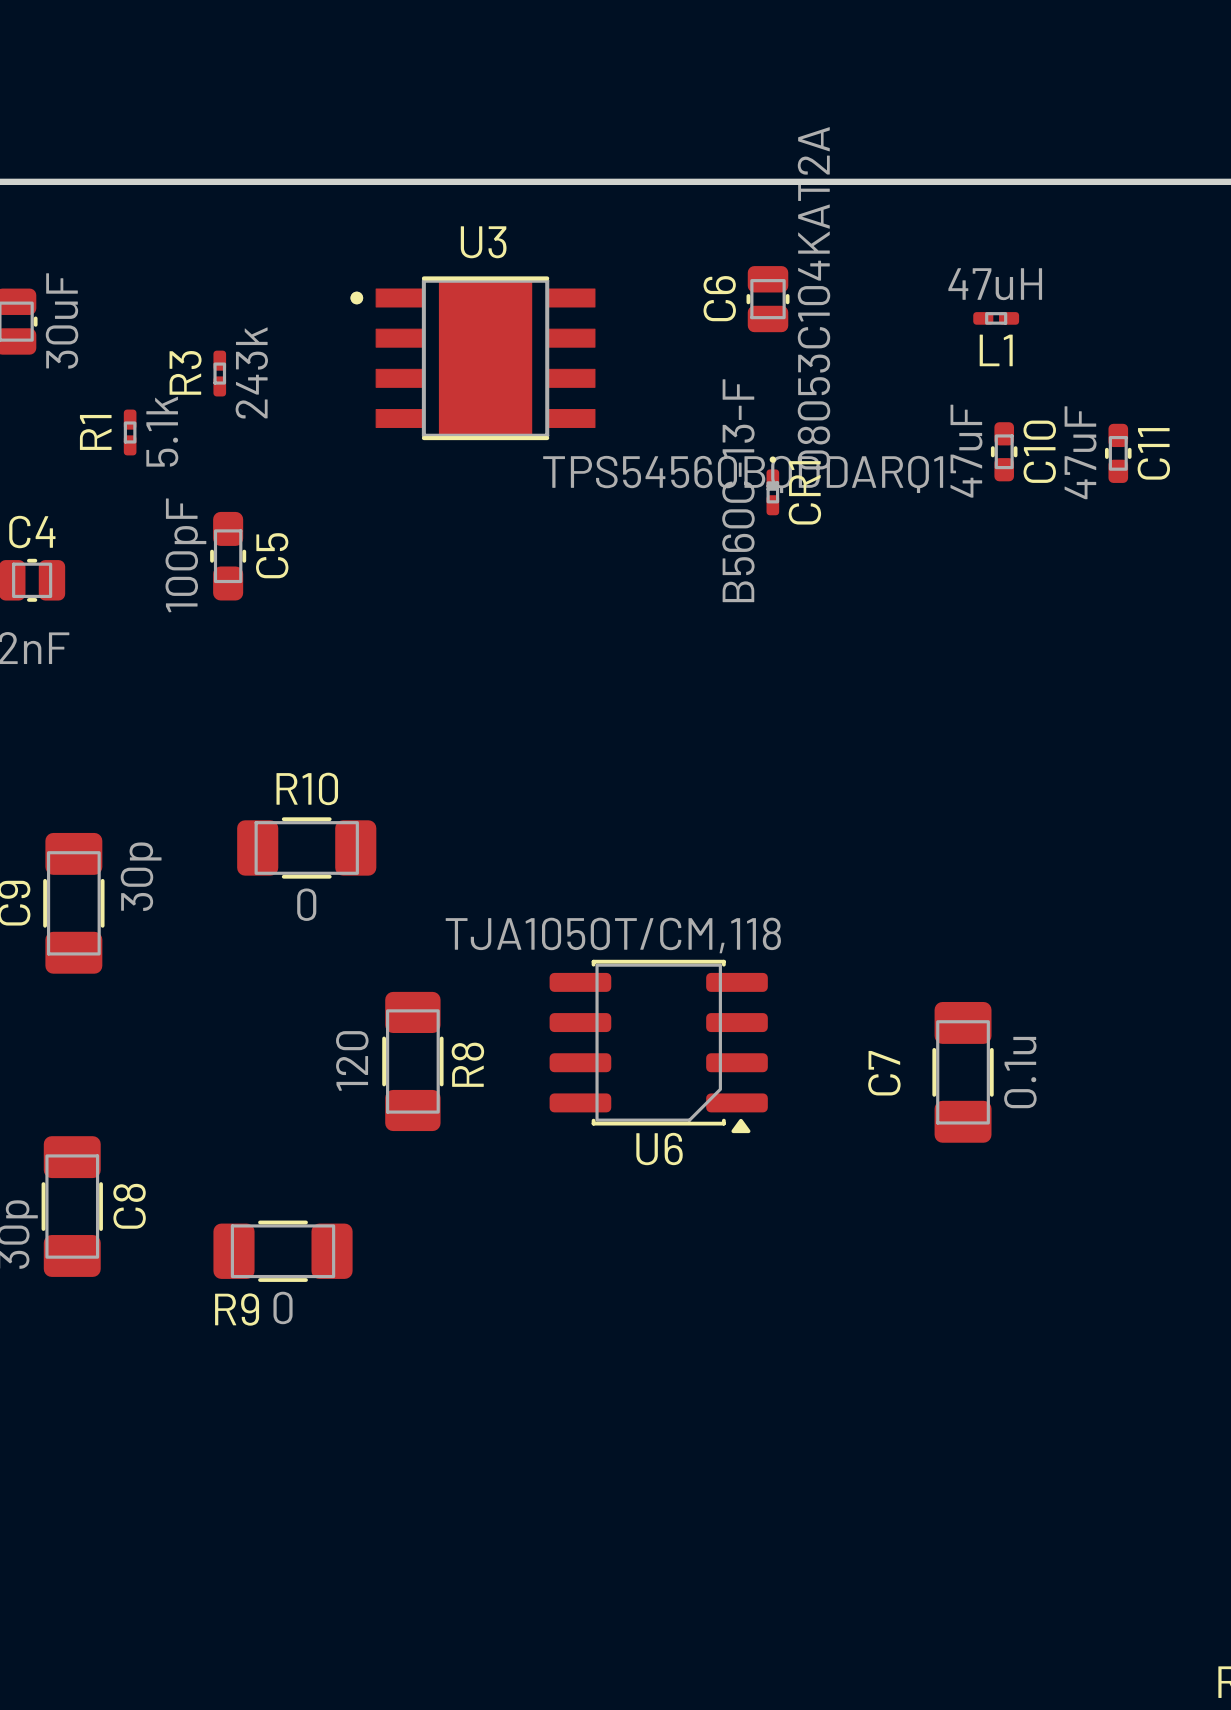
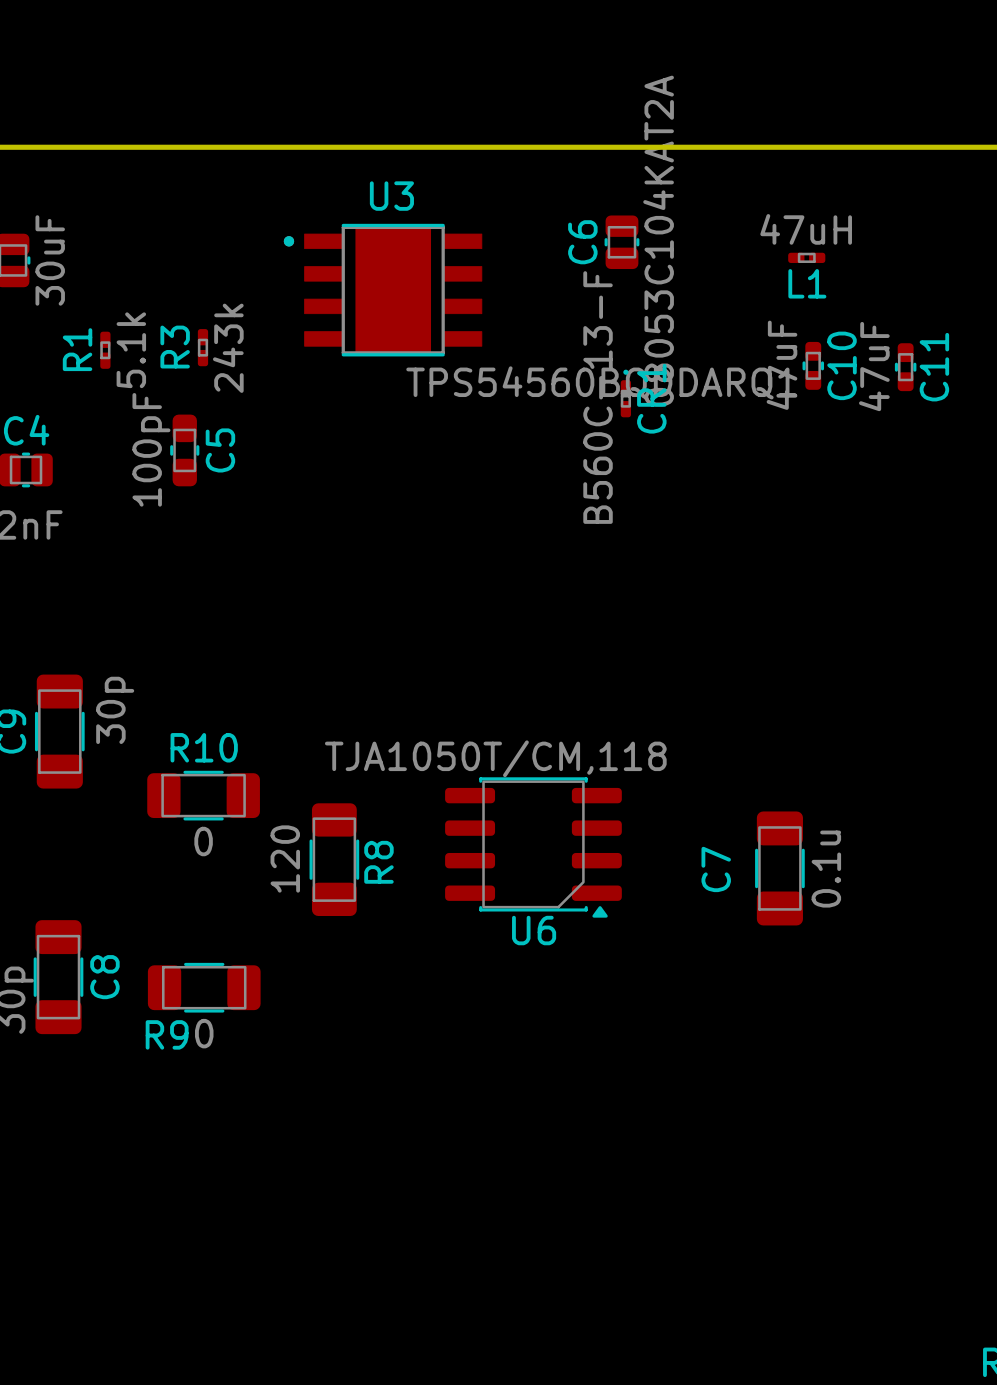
R3 position: (219, 373) -> (202, 347)
R10 position: (306, 847) -> (203, 795)
R9 position: (283, 1251) -> (204, 987)

